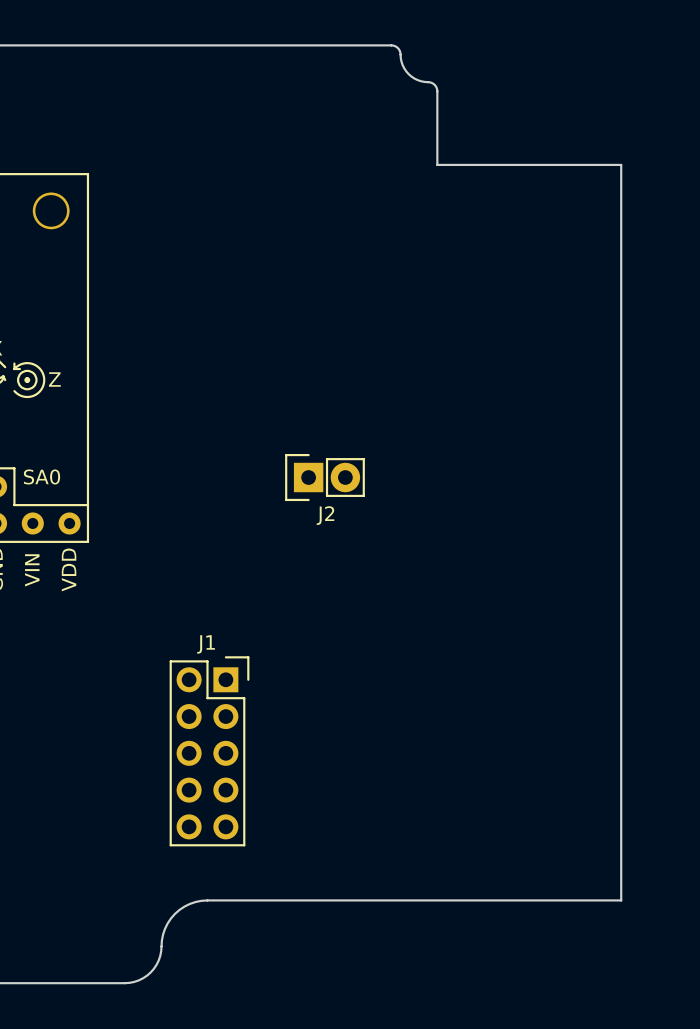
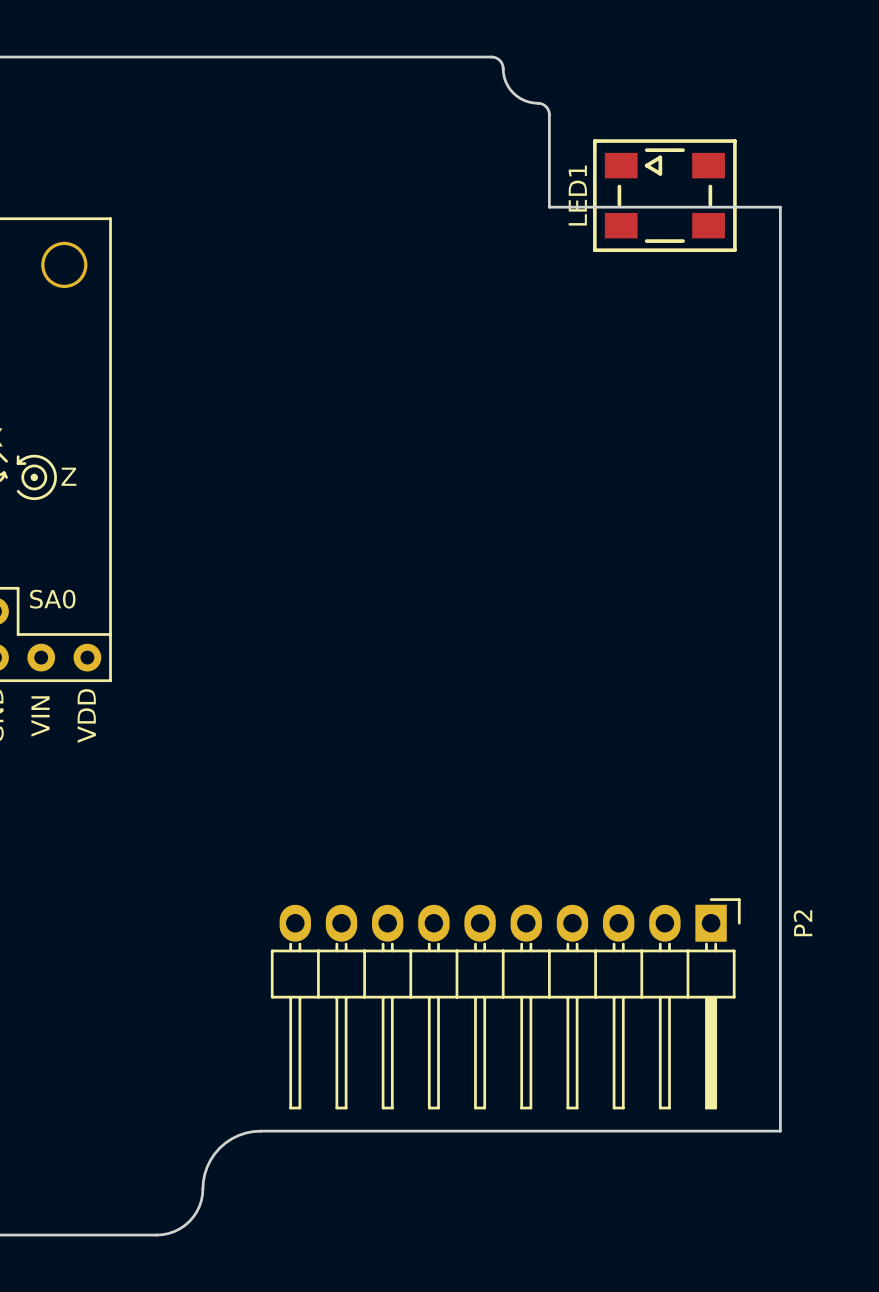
LED1: none -> (664, 195)
J2: (324, 477) -> none
J1: (209, 751) -> none
P2: none -> (505, 1003)

